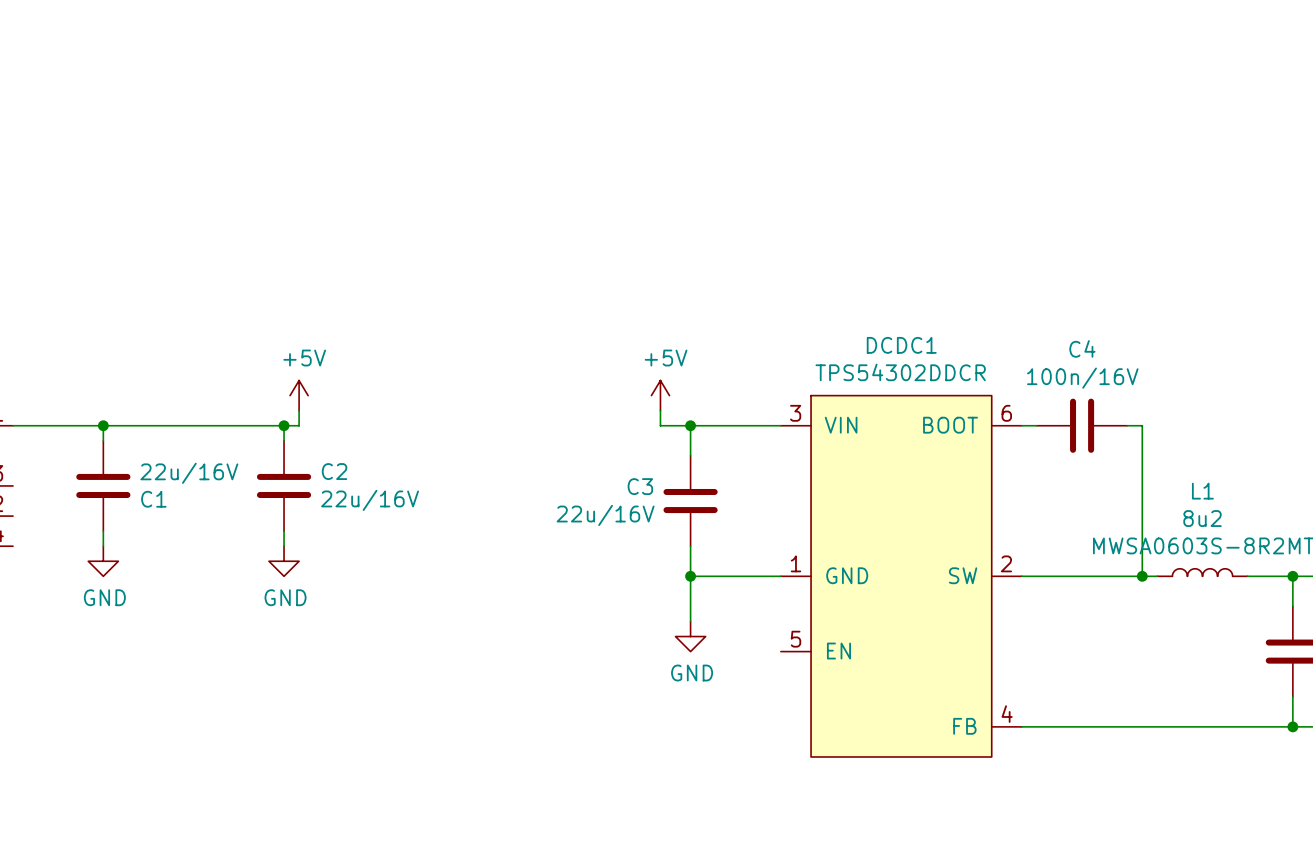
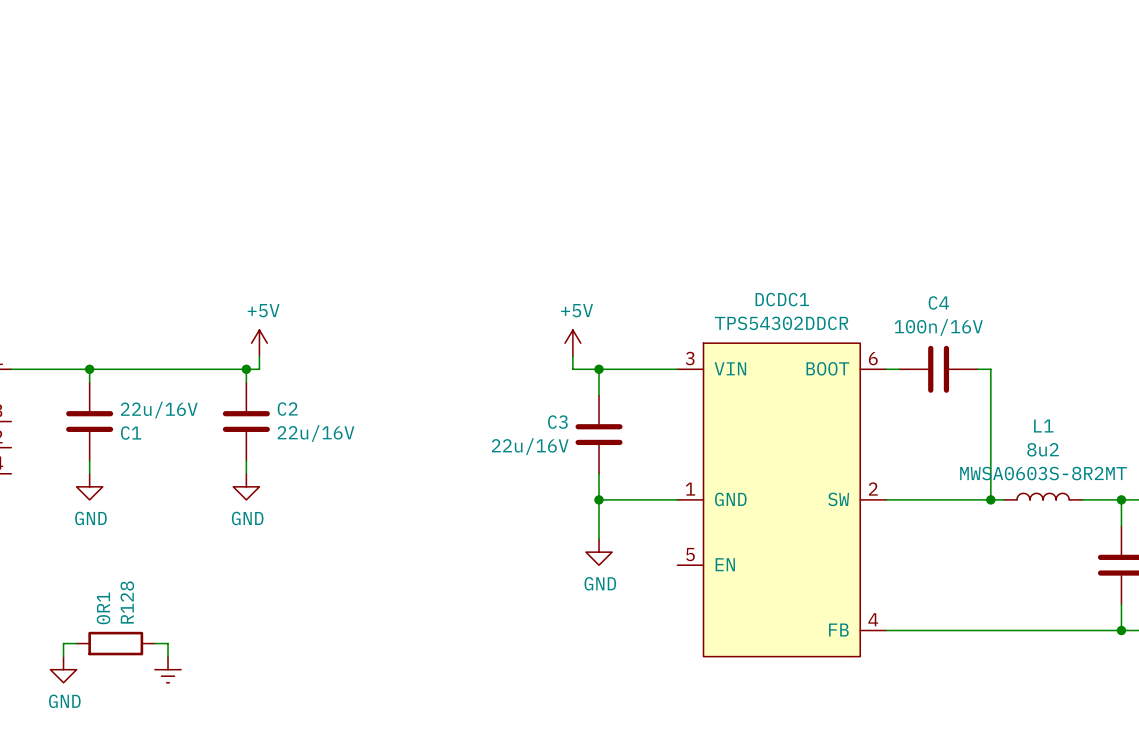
wire: none -> (76, 643) (63, 643) (63, 656)
R128: none -> 0R1 (115, 643)
wire: none -> (154, 643) (168, 643) (168, 656)
power symbol: none -> GND (63, 669)
power symbol: none -> (168, 669)

